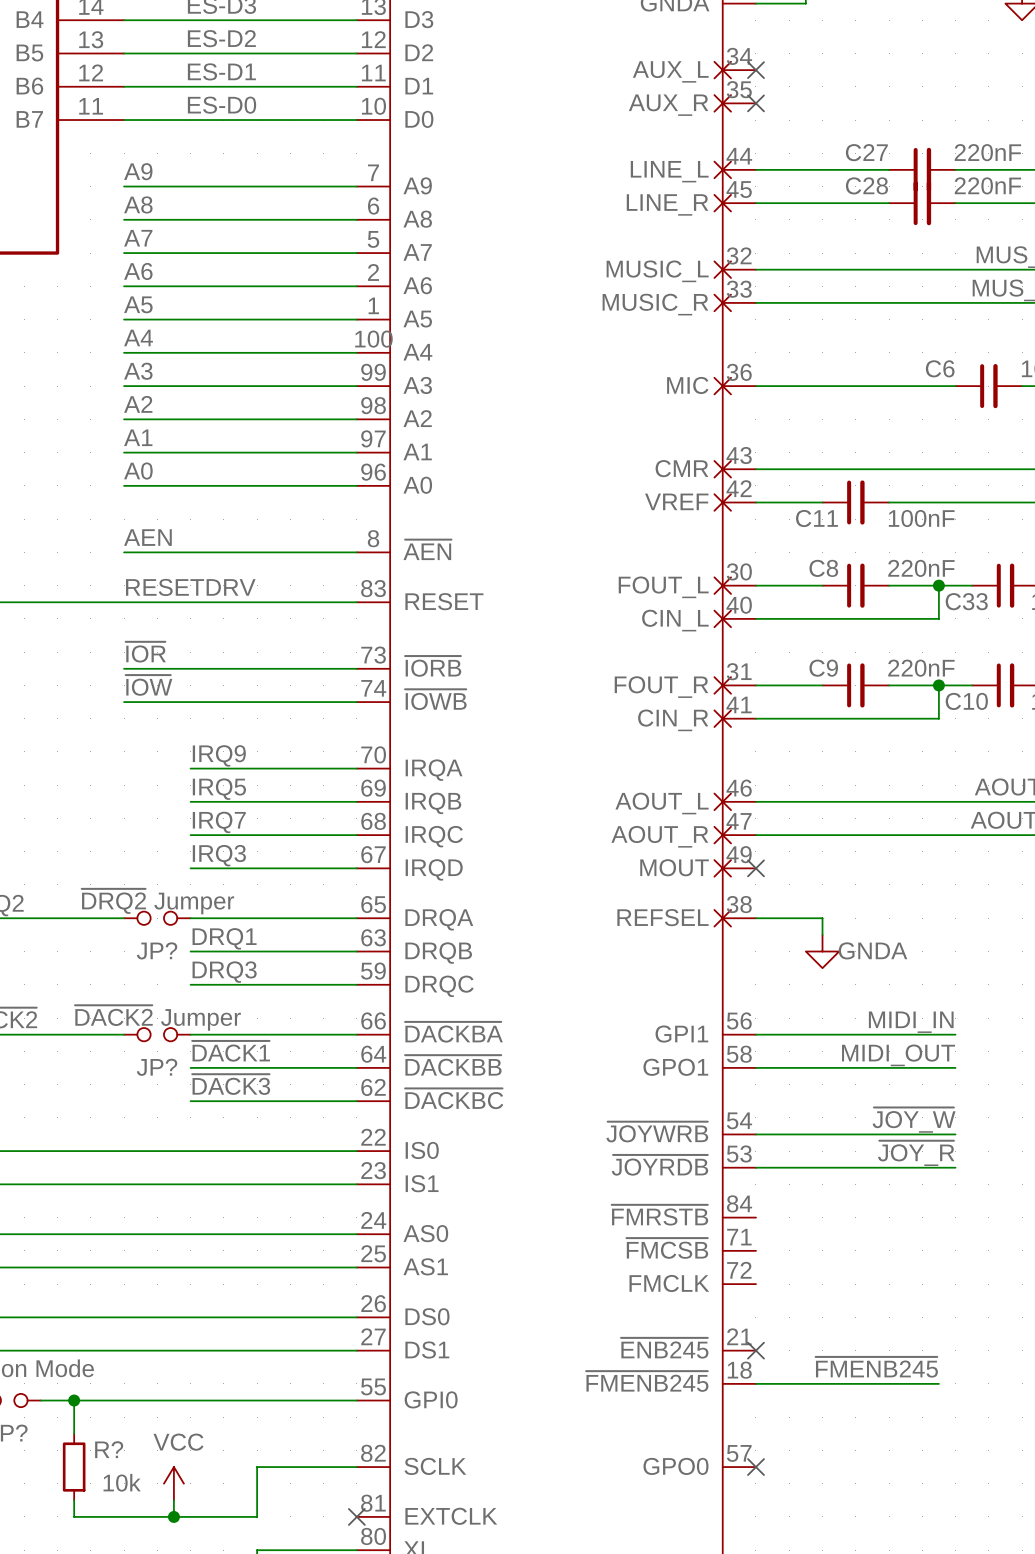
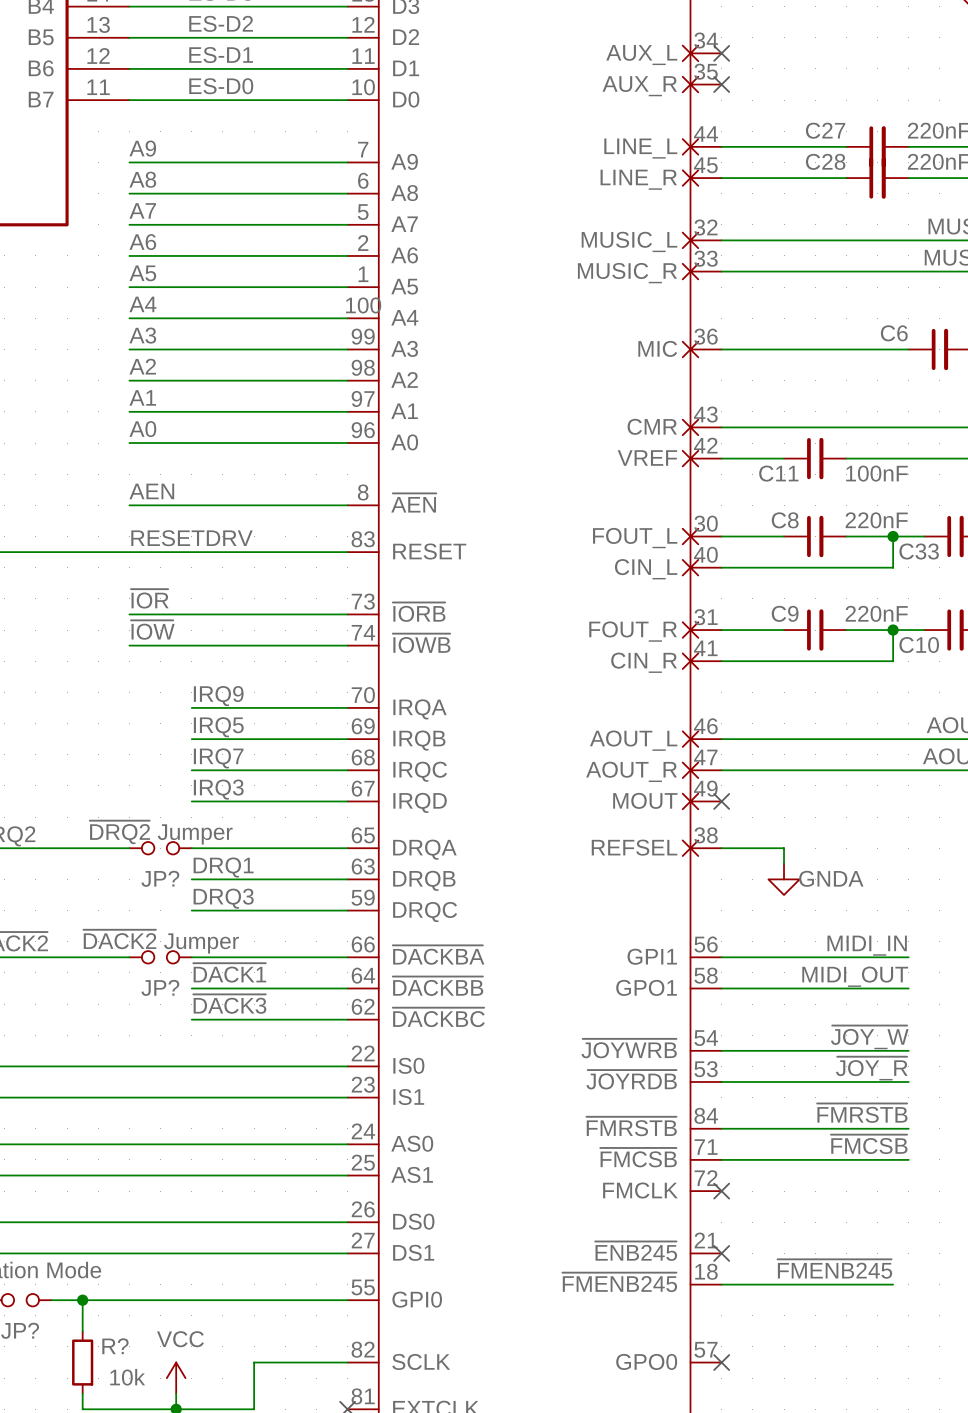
label: none -> ~{FMRSTB} (862, 1113)
wire: none -> (721, 1128) (908, 1128)
label: none -> ~{FMCSB} (869, 1144)
wire: none -> (721, 1159) (908, 1159)
no-connect mark: none -> (721, 1191)

